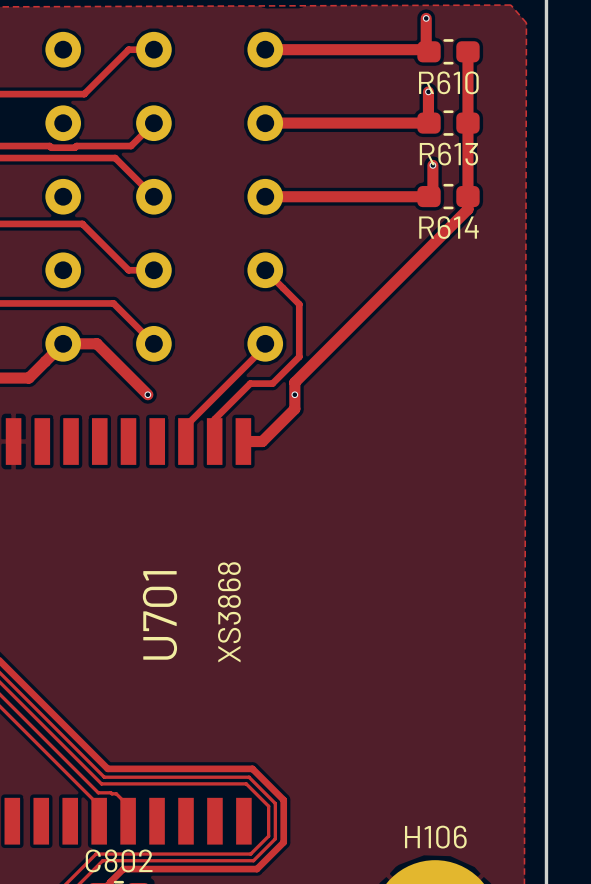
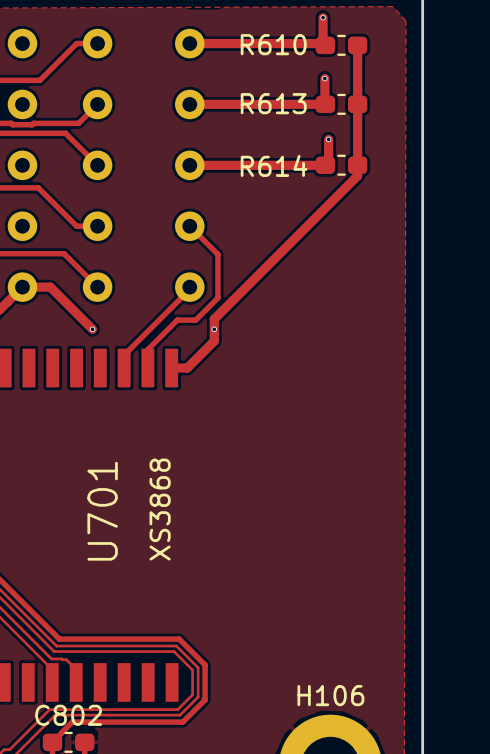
R610 name position: R610 (448, 82) -> R610 (273, 44)
R613 name position: R613 (448, 154) -> R613 (273, 103)
R614 name position: R614 (449, 227) -> R614 (274, 165)

